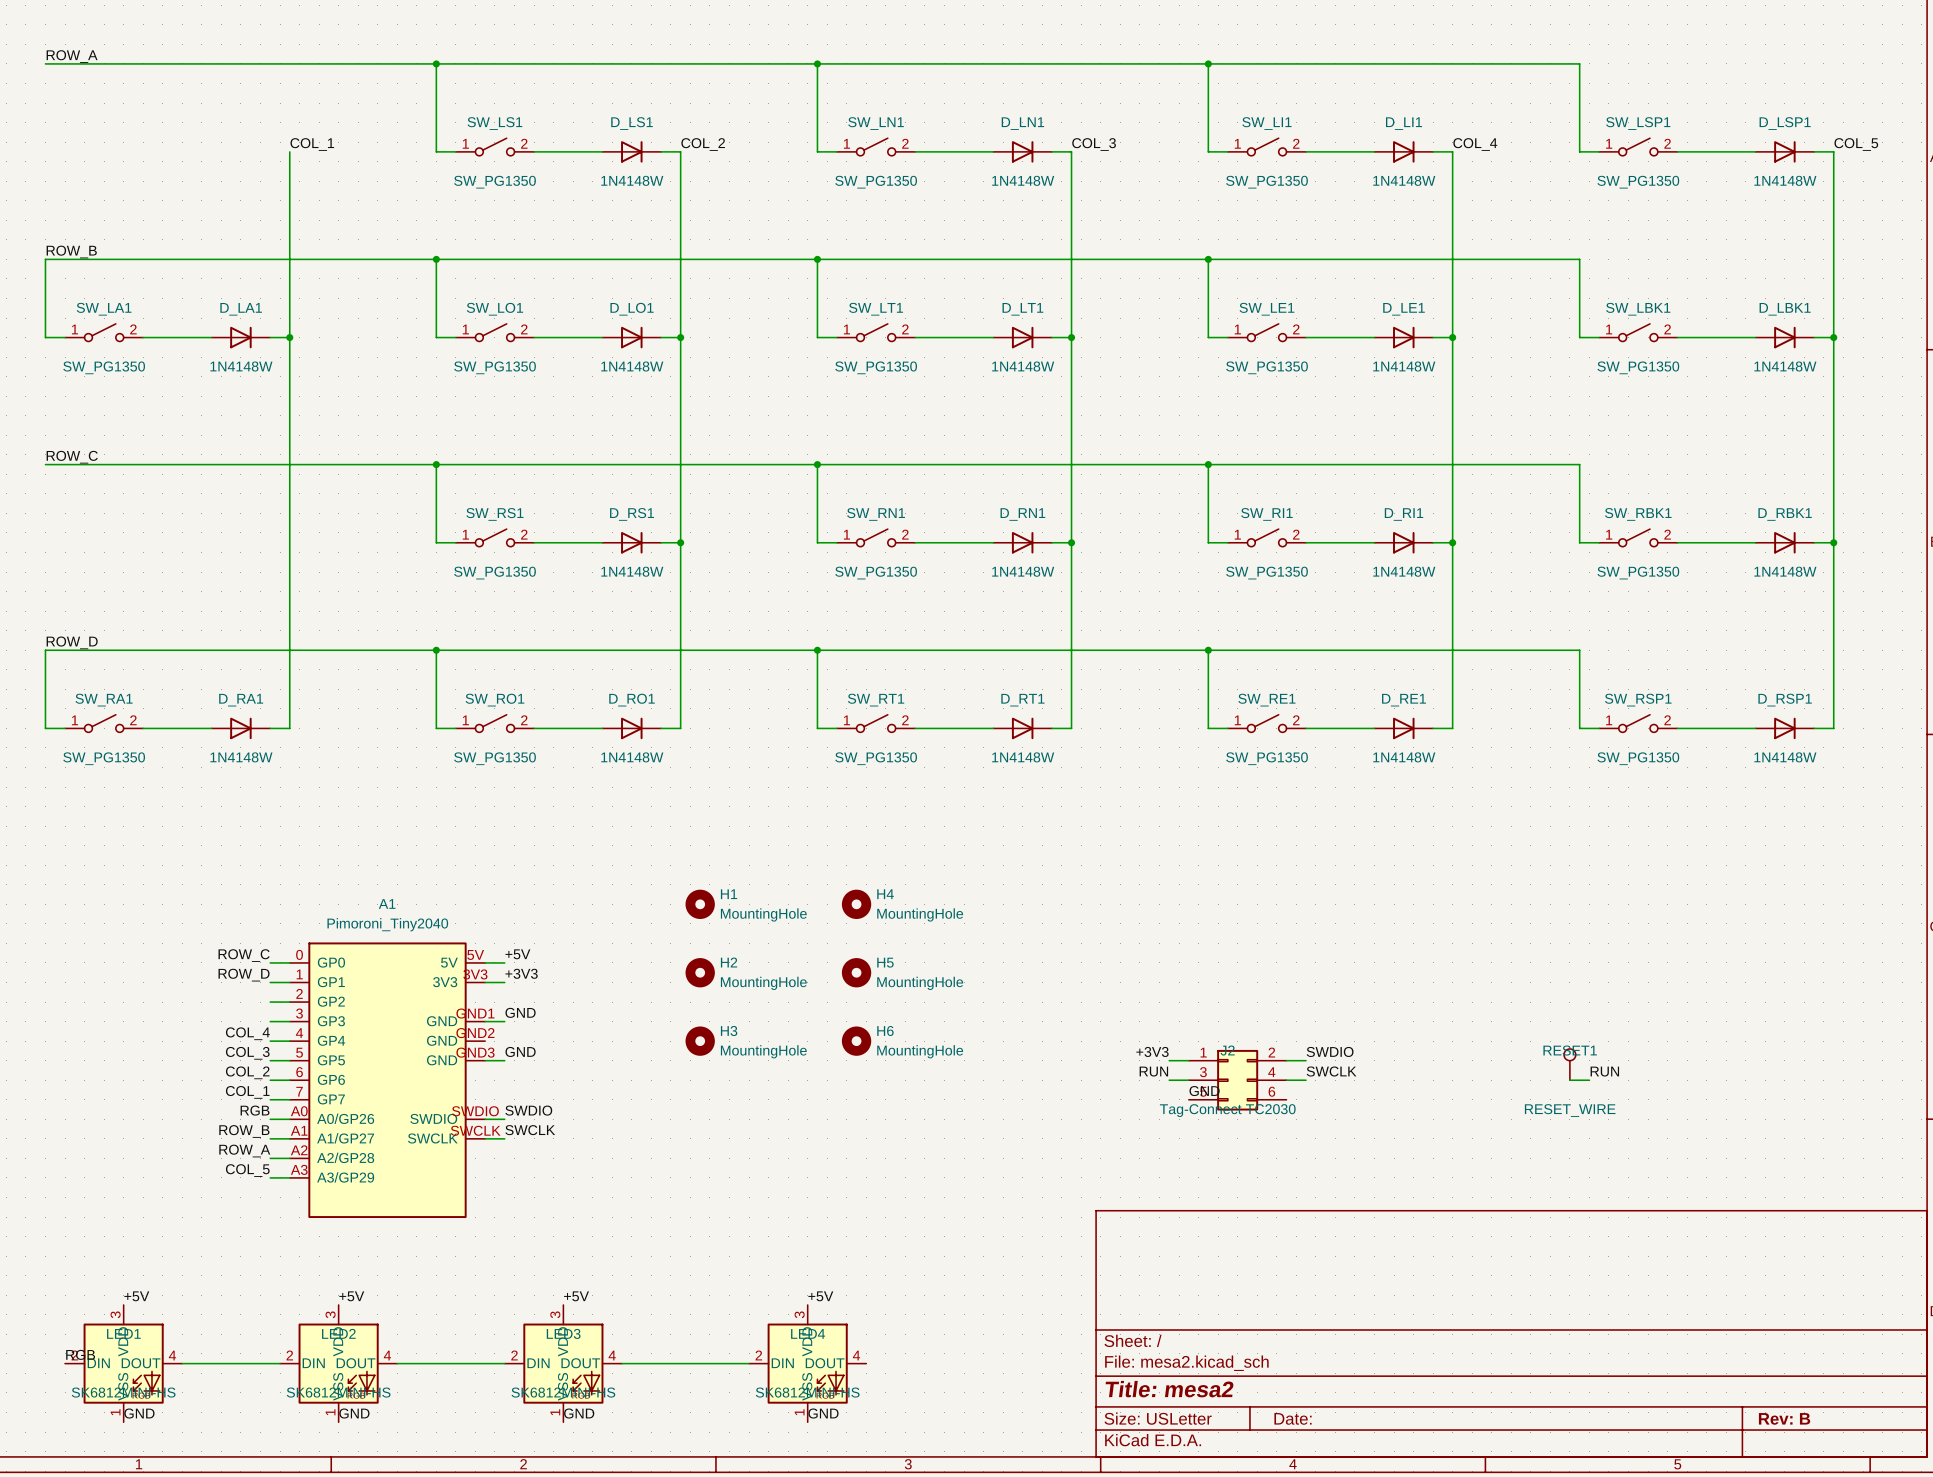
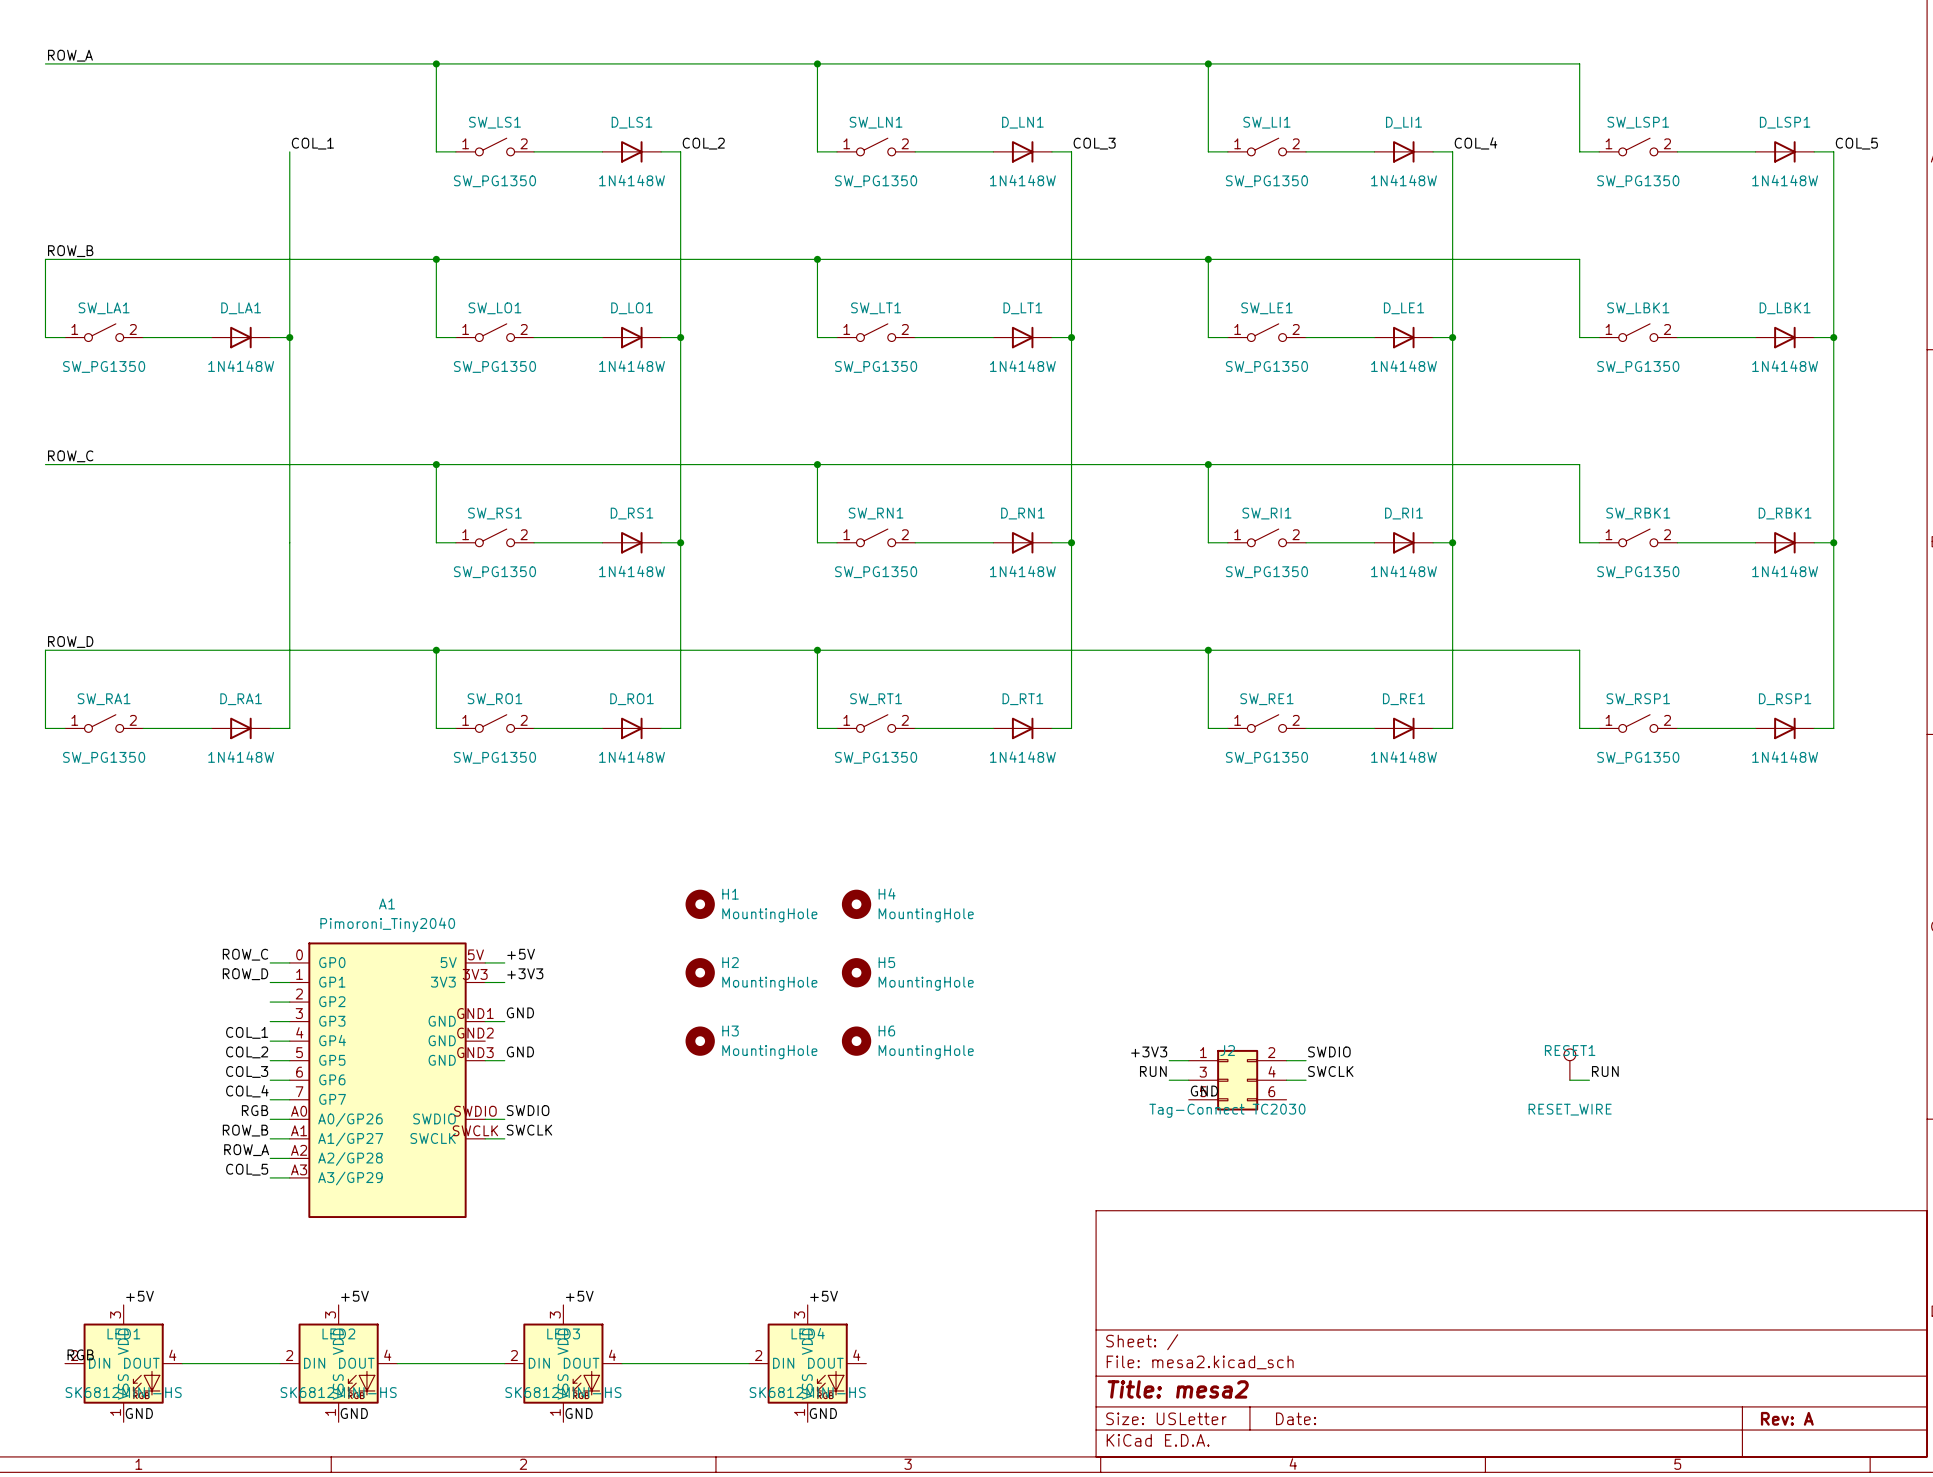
label: COL_4 (247, 1033) -> COL_1 (247, 1032)
label: COL_3 (247, 1053) -> COL_2 (247, 1052)
label: COL_2 (247, 1072) -> COL_3 (247, 1071)
label: COL_1 (247, 1092) -> COL_4 (247, 1091)
title block: Rev: B (1784, 1418) -> Rev: A (1787, 1418)

